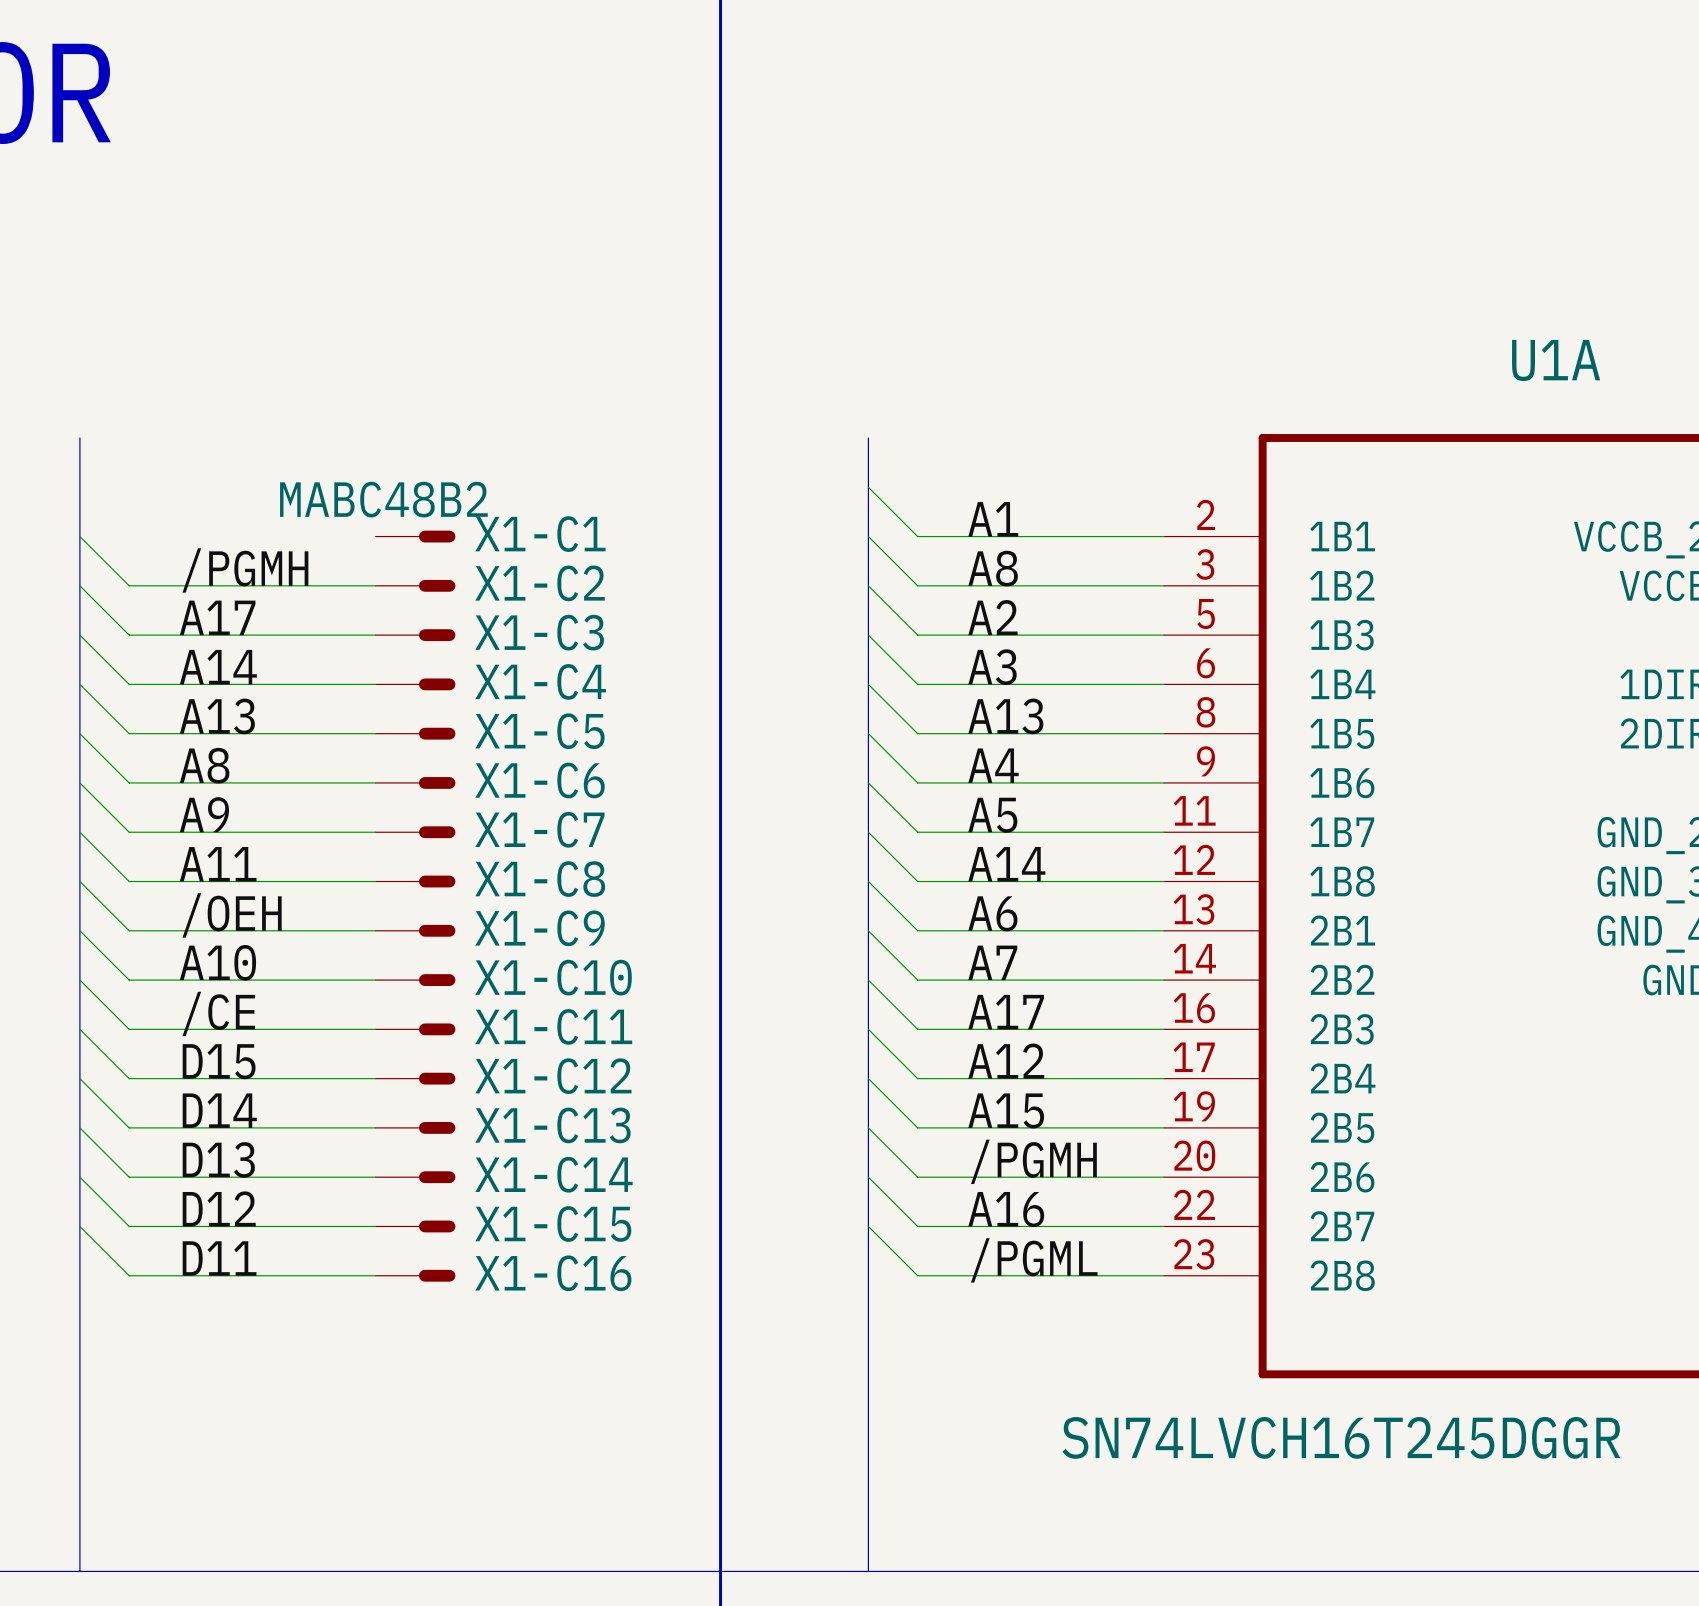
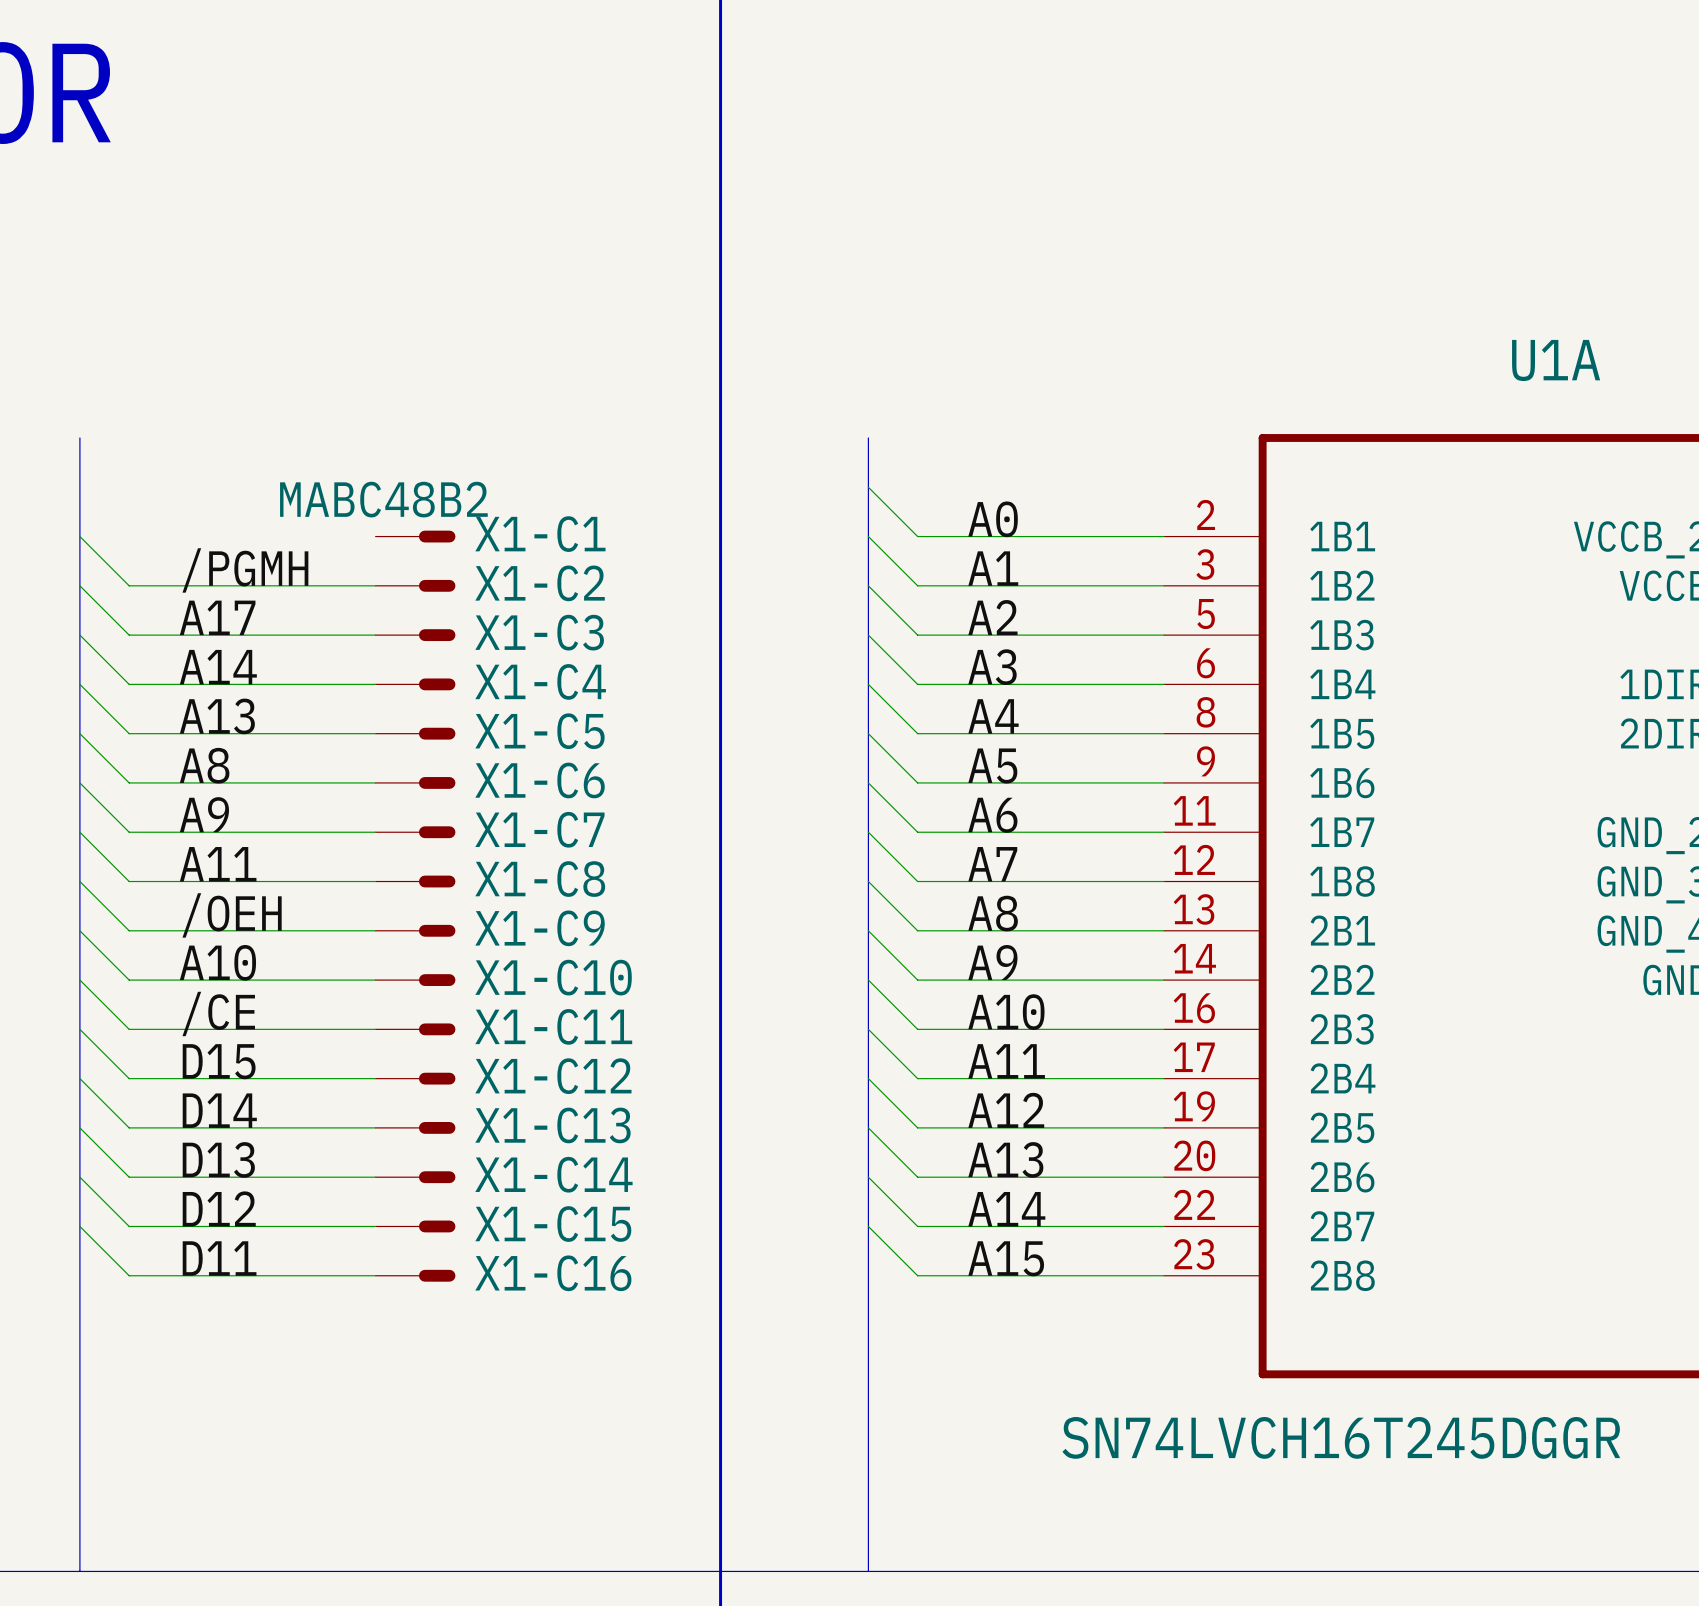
label: A1 (993, 519) -> A0 (993, 519)
label: A8 (993, 568) -> A1 (993, 568)
label: A13 (1005, 716) -> A4 (993, 716)
label: A4 (993, 765) -> A5 (992, 766)
label: A5 (992, 815) -> A6 (992, 815)
label: A14 (1006, 864) -> A7 (992, 864)
label: A6 (992, 913) -> A8 (993, 913)
label: A7 (992, 962) -> A9 (992, 962)
label: A17 (1006, 1012) -> A10 (1006, 1012)
label: A12 (1006, 1061) -> A11 (1006, 1061)
label: A15 (1006, 1110) -> A12 (1006, 1110)
label: /PGMH (1033, 1161) -> A13 (1005, 1159)
label: A16 (1006, 1209) -> A14 (1006, 1209)
label: /PGML (1034, 1260) -> A15 (1006, 1258)

